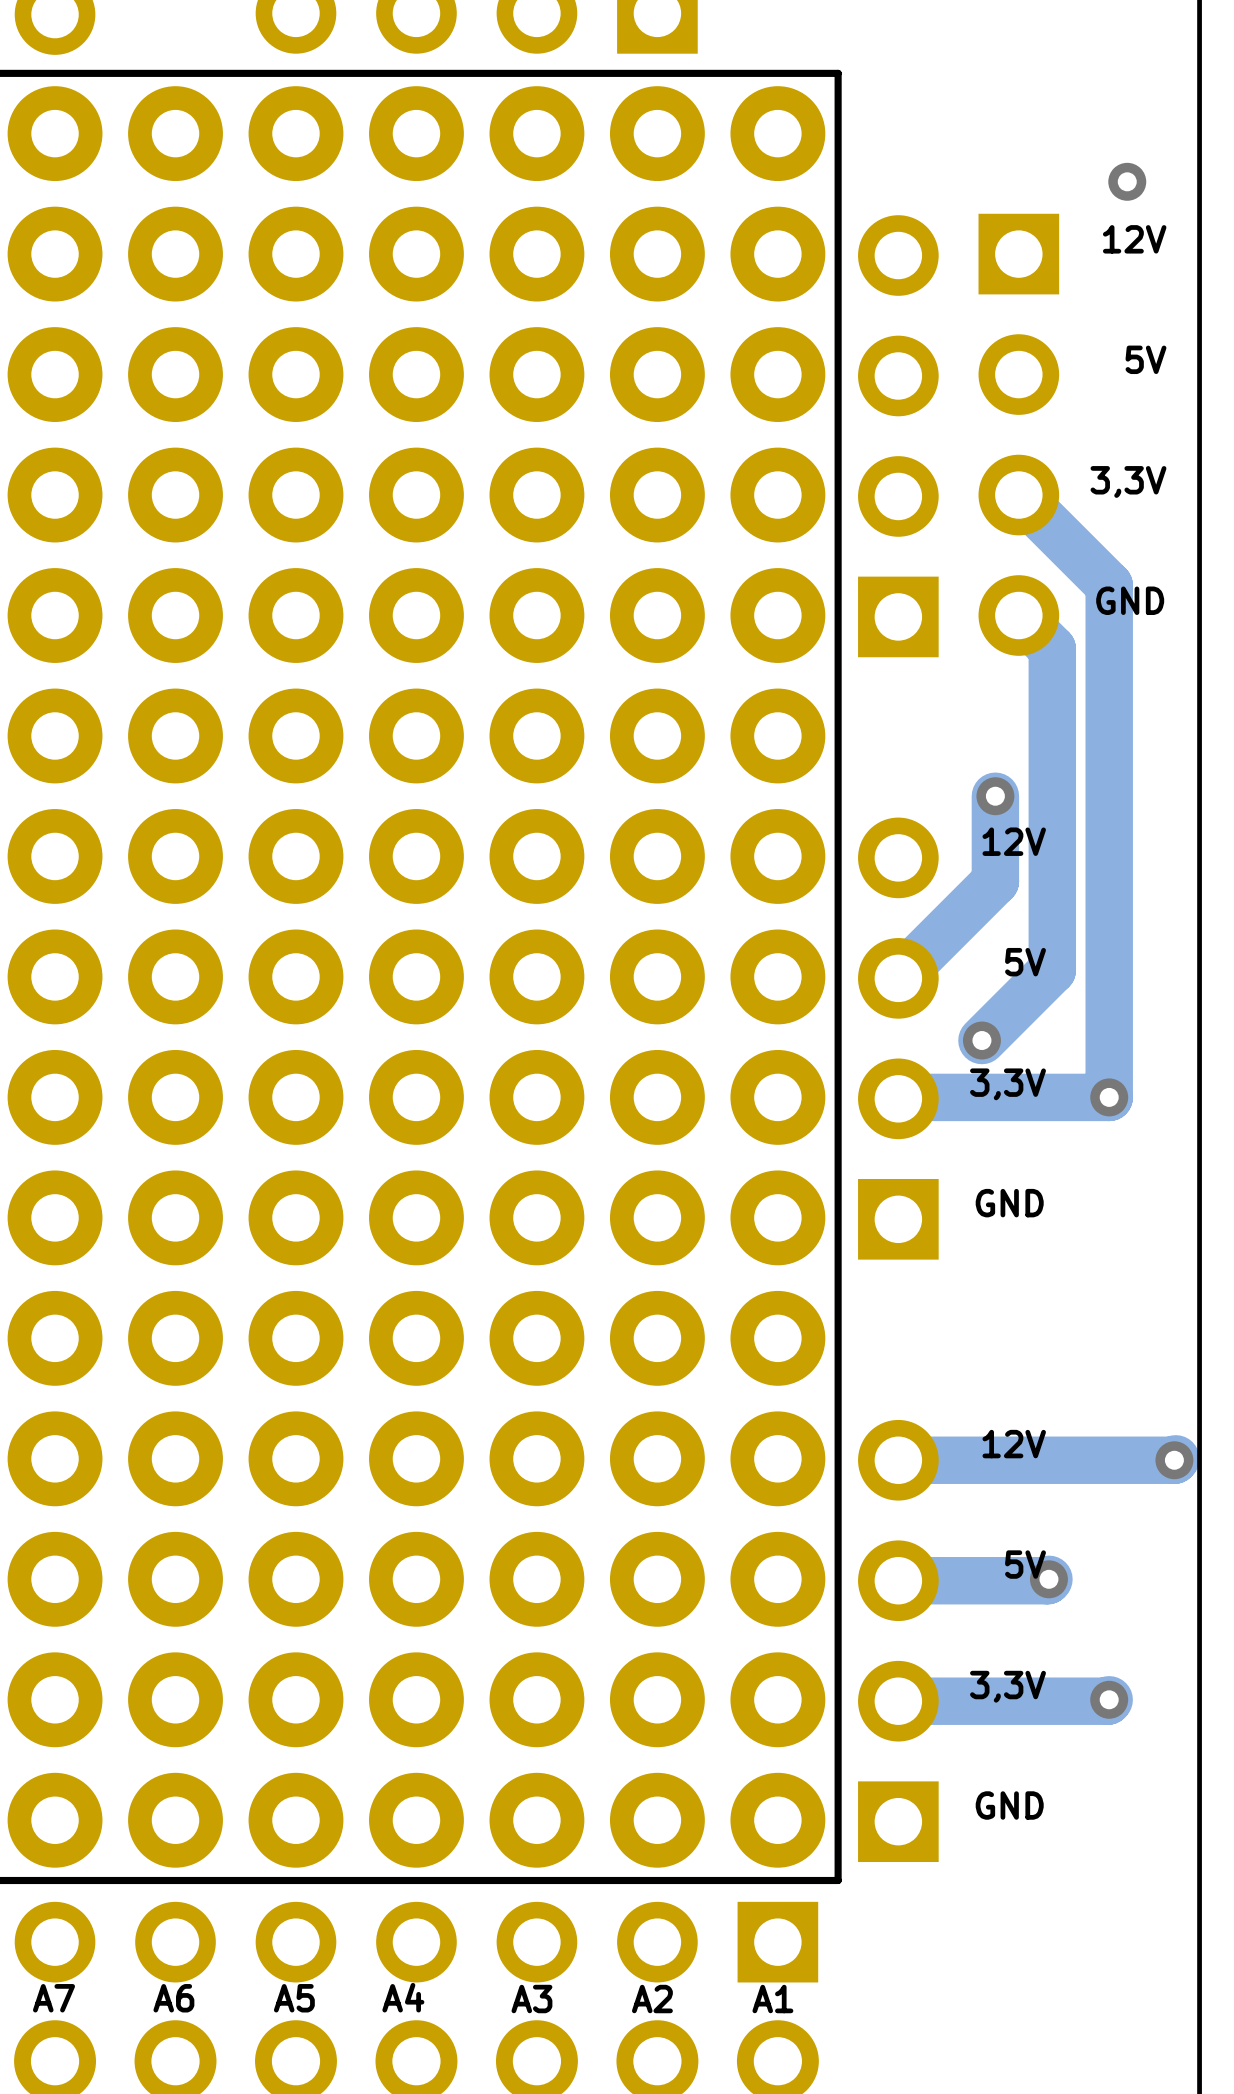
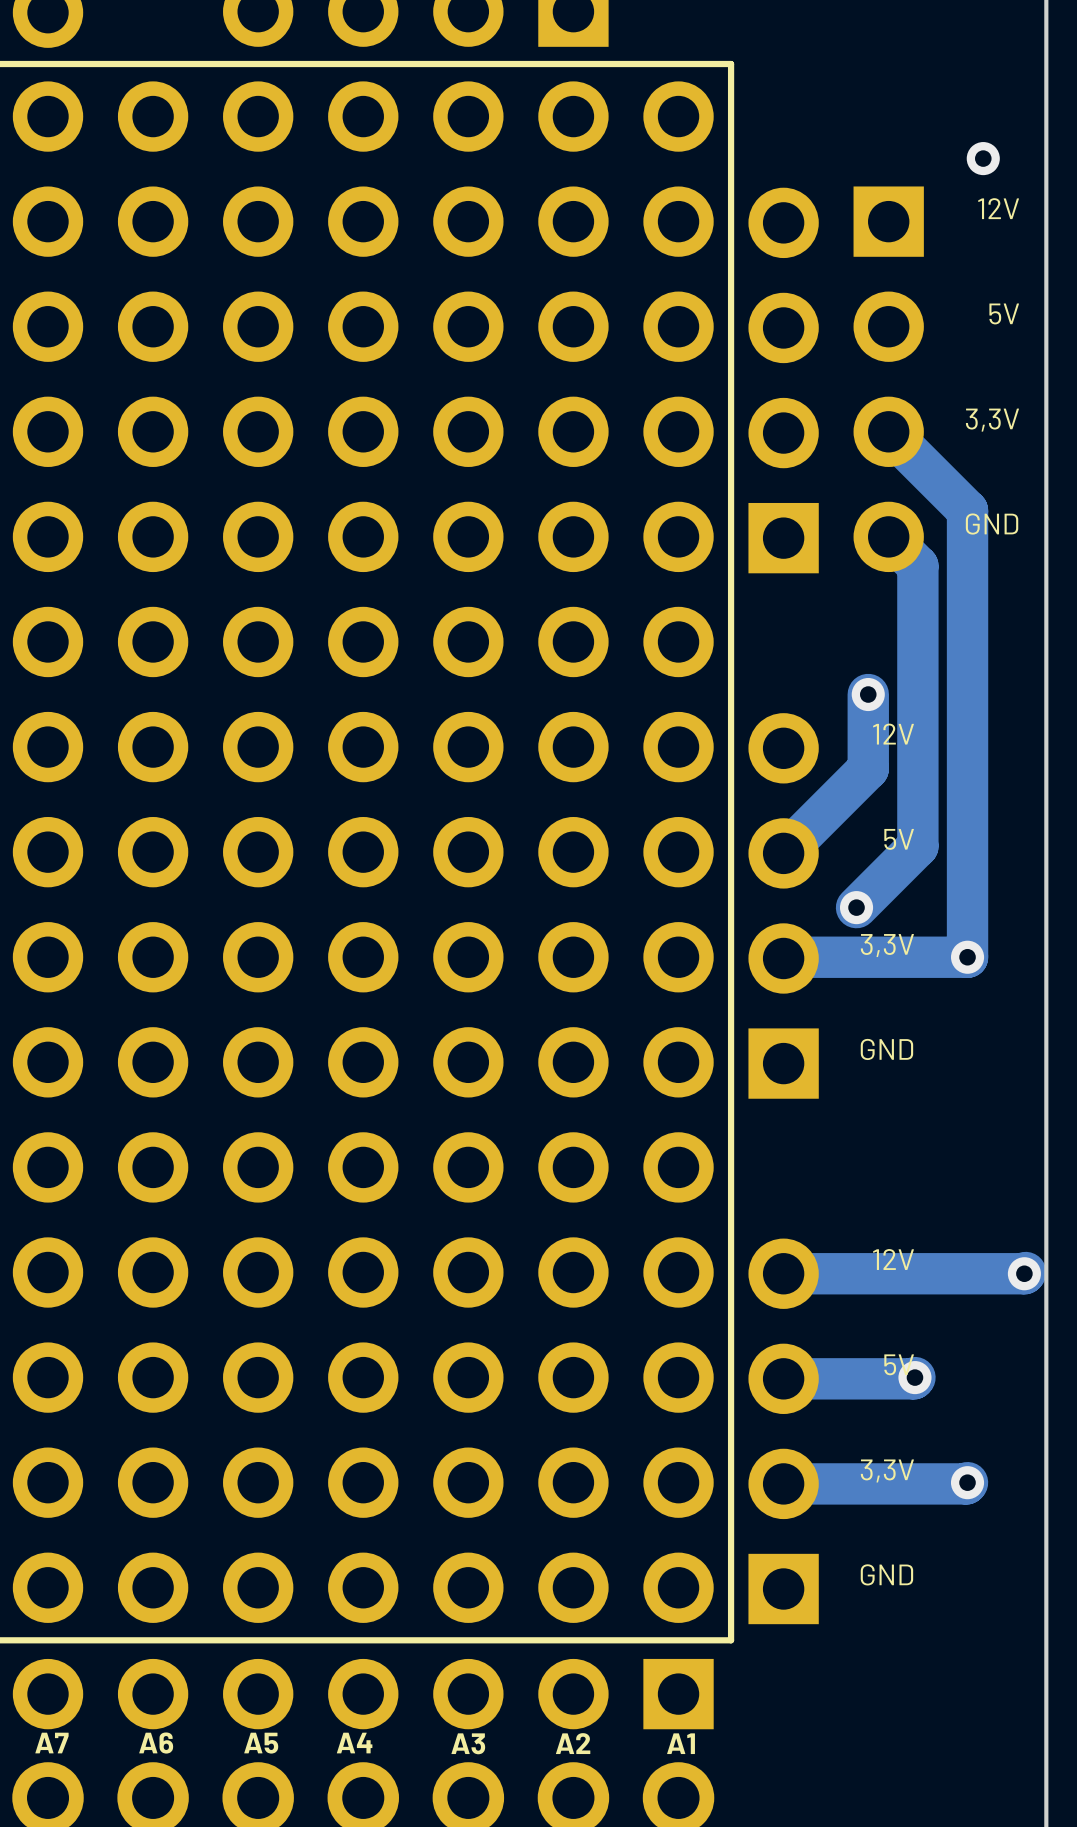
part footprint: [7, 86, 103, 1868] -> [12, 81, 84, 1623]
part footprint: [128, 86, 223, 1868] -> [117, 81, 189, 1623]
part footprint: [248, 86, 344, 1868] -> [223, 81, 294, 1623]
part footprint: [369, 86, 464, 1868] -> [328, 81, 399, 1623]
part footprint: [489, 86, 585, 1868] -> [433, 81, 504, 1623]
part footprint: [609, 86, 705, 1868] -> [538, 81, 609, 1623]
part footprint: [730, 86, 826, 1868] -> [643, 81, 714, 1623]

